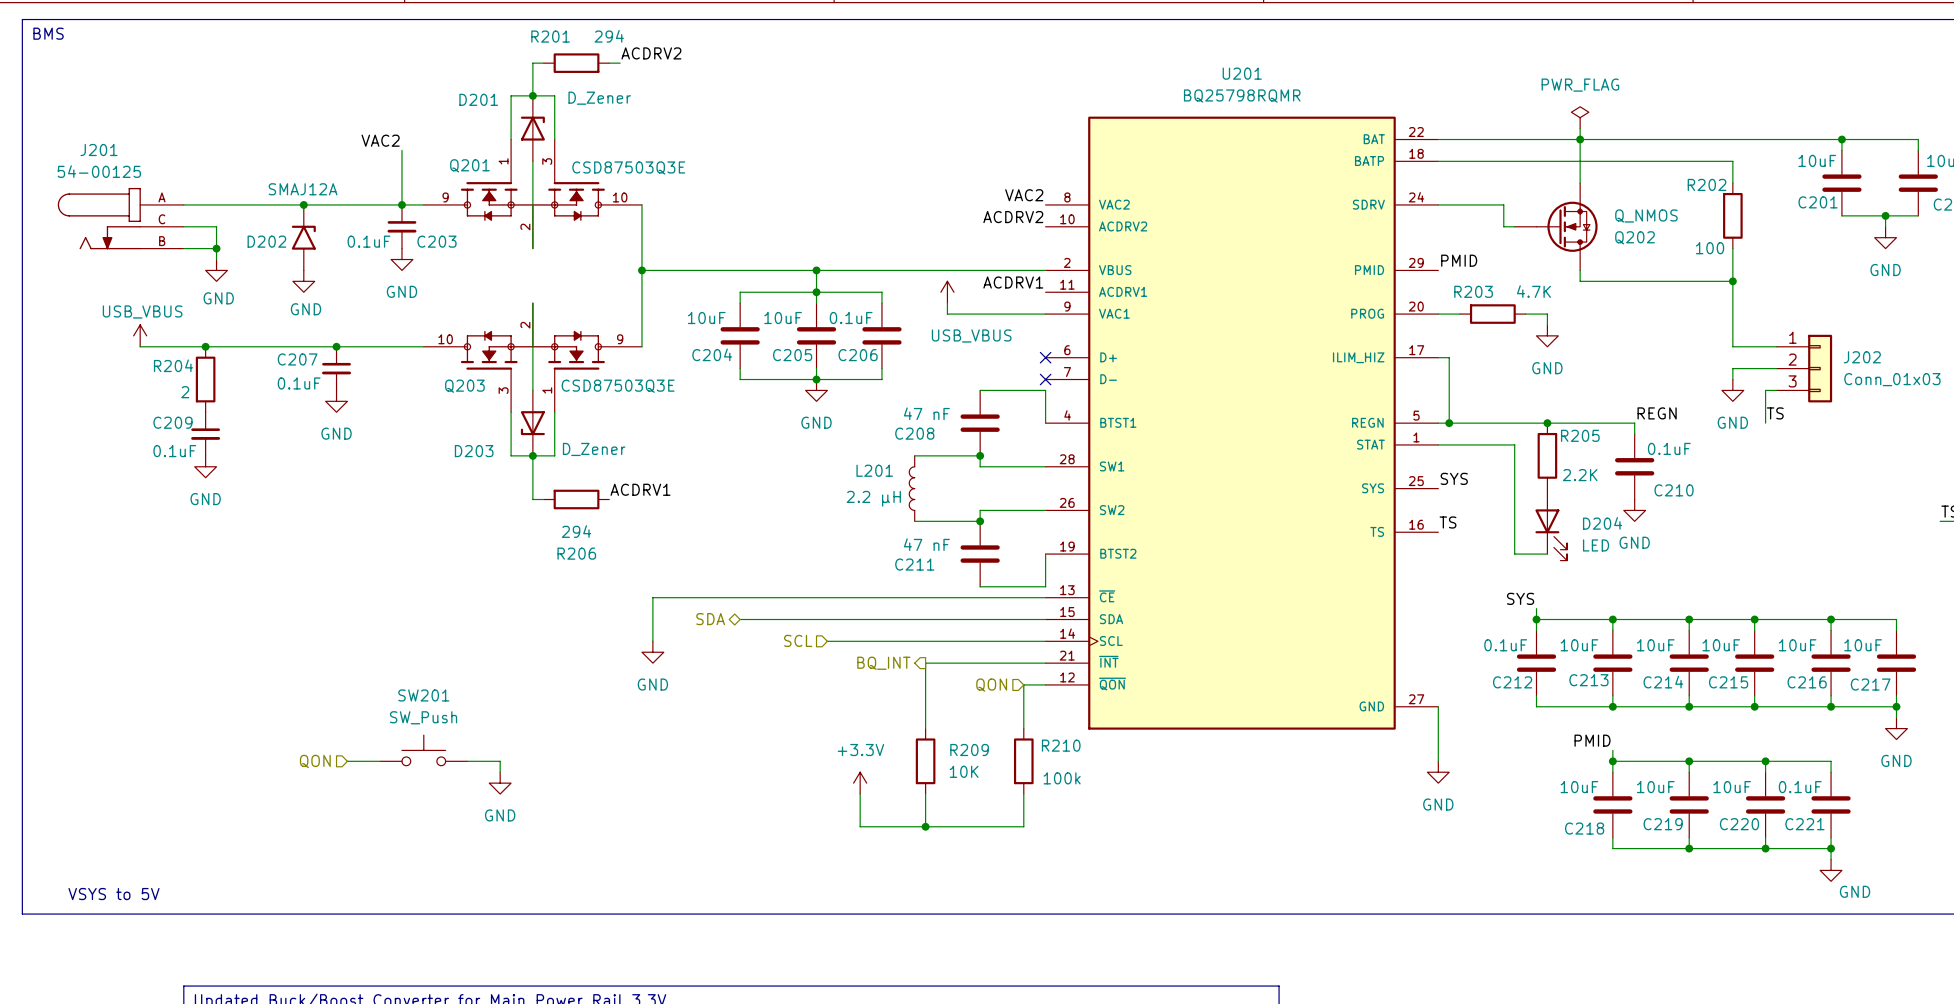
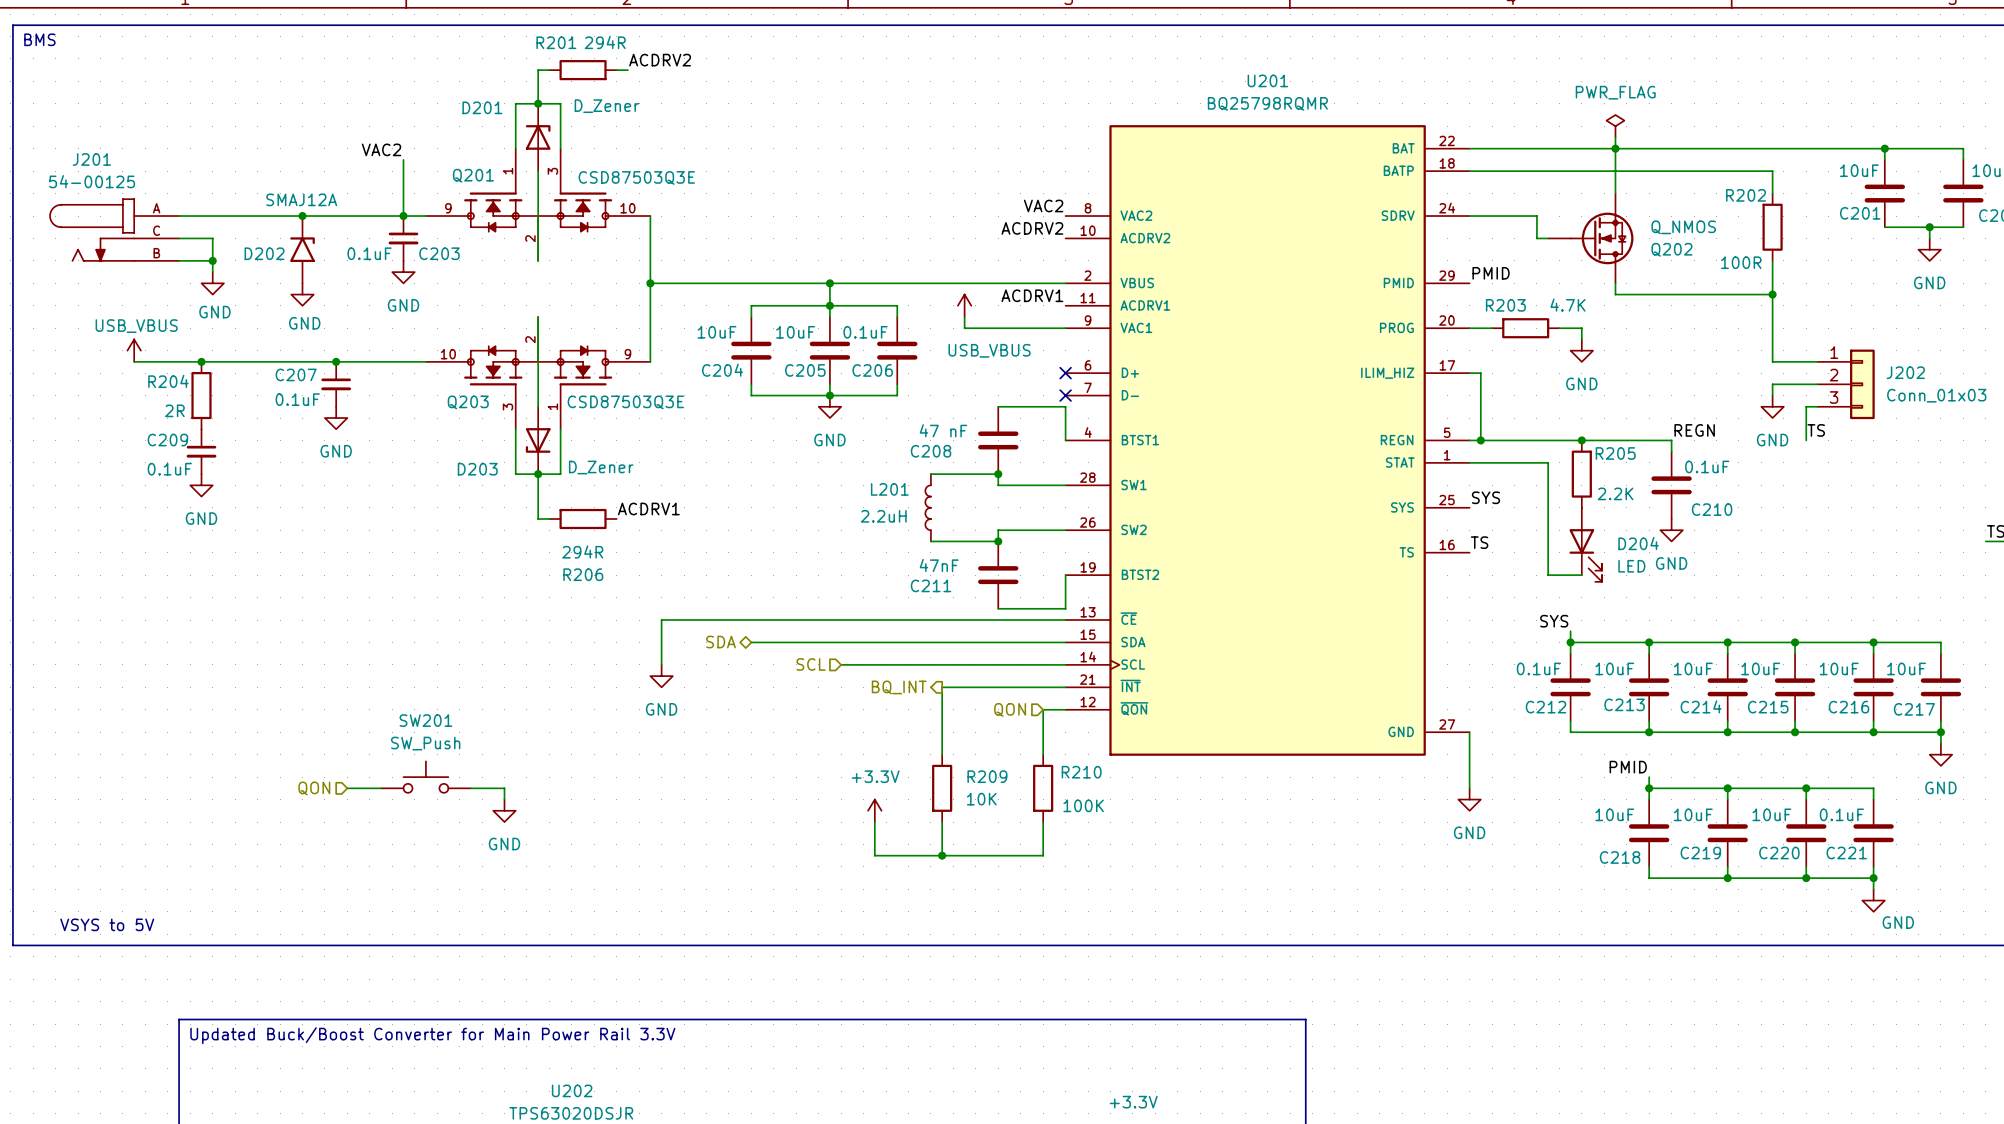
R201 value: 294 (609, 36) -> 294R (605, 42)
R202 value: 100 (1710, 248) -> 100R (1741, 262)
R204 value: 2 (185, 392) -> 2R (174, 410)
L201 value: 2.2 µH (873, 498) -> 2.2uH (883, 516)
R206 value: 294 (576, 531) -> 294R (582, 551)
C211 value: 47 nF (926, 544) -> 47nF (939, 565)
R210 value: 100k (1062, 778) -> 100K (1083, 805)

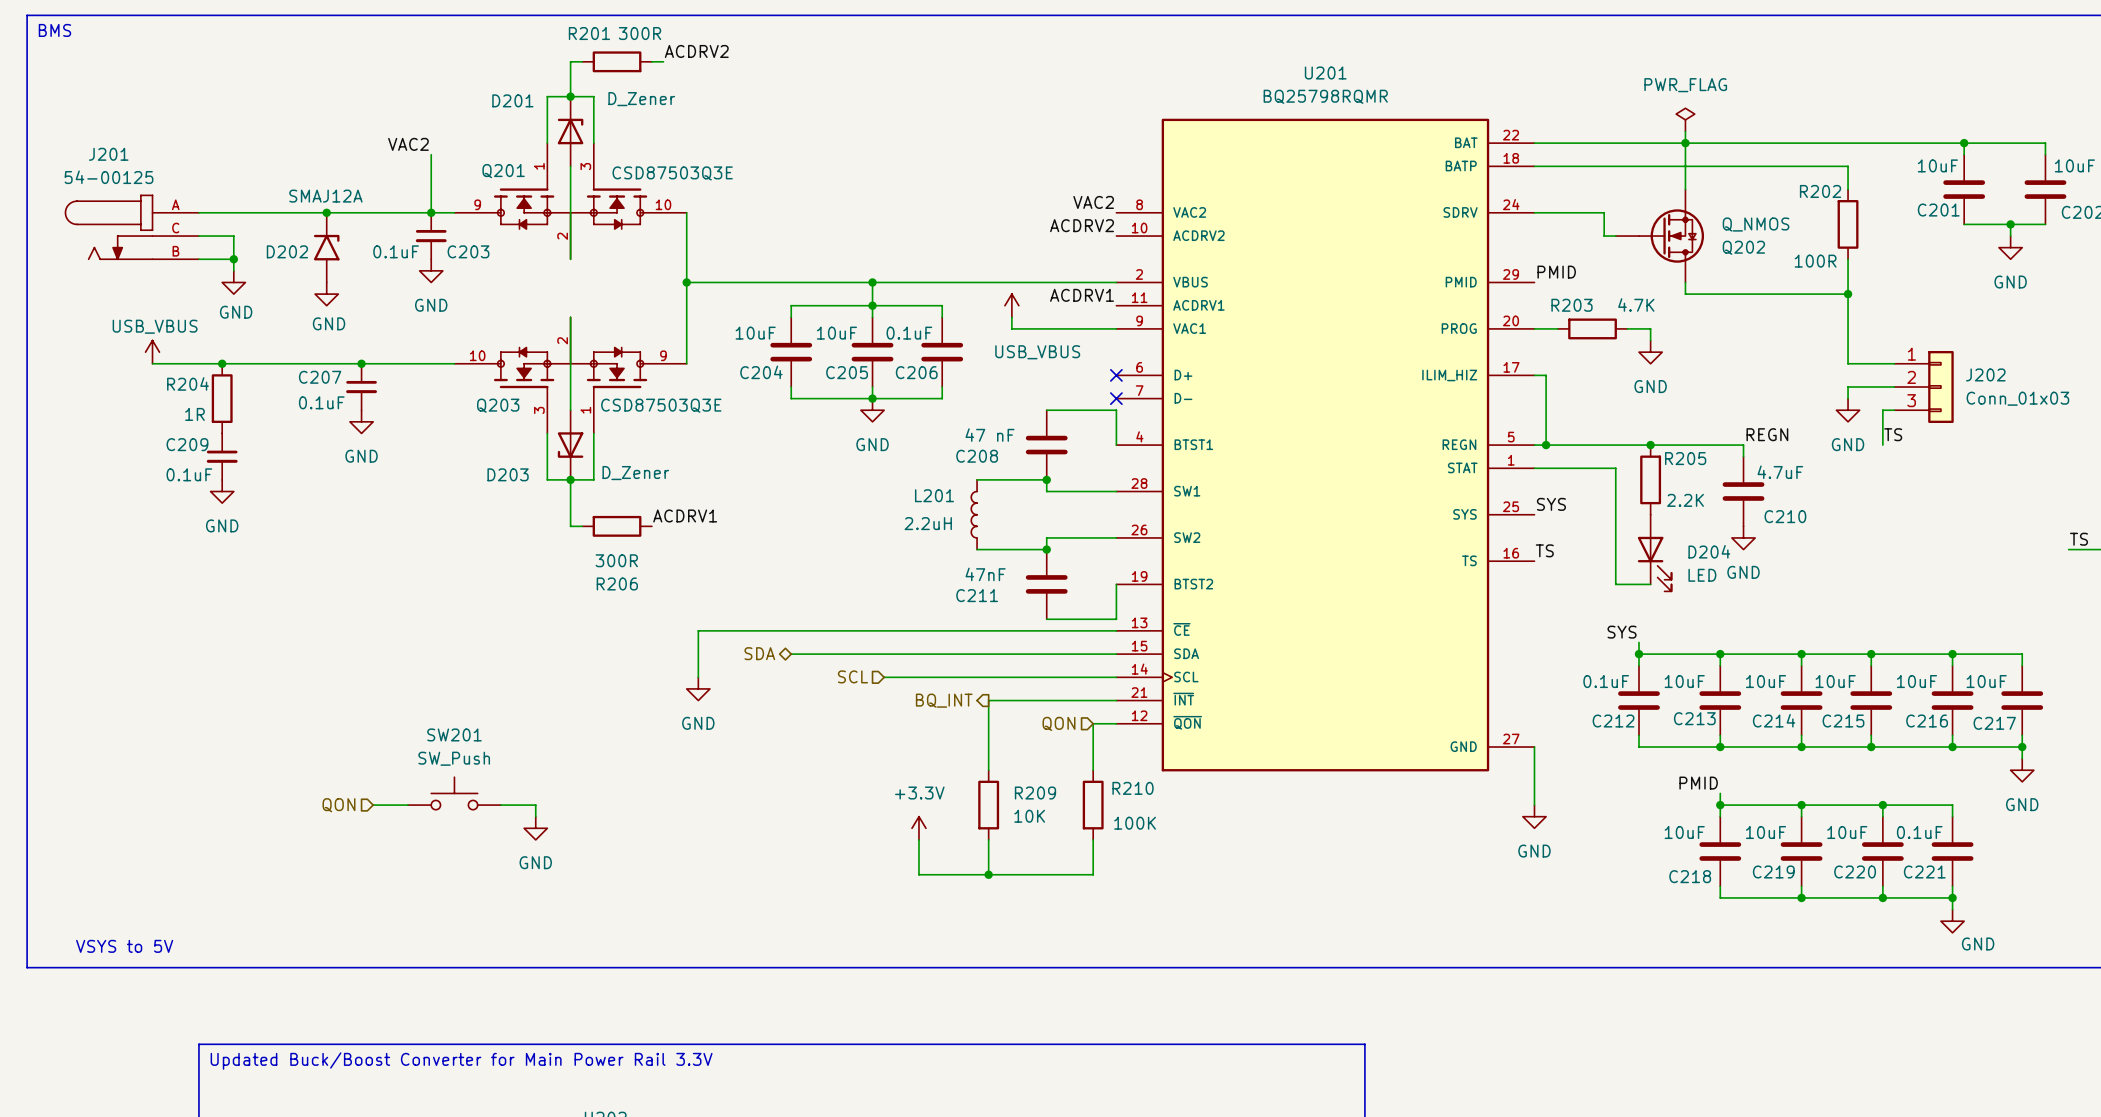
R201 value: 294R (605, 42) -> 300R (639, 33)
R204 value: 2R (174, 410) -> 1R (194, 414)
C210 value: 0.1uF (1707, 466) -> 4.7uF (1780, 472)
R206 value: 294R (582, 551) -> 300R (616, 560)

